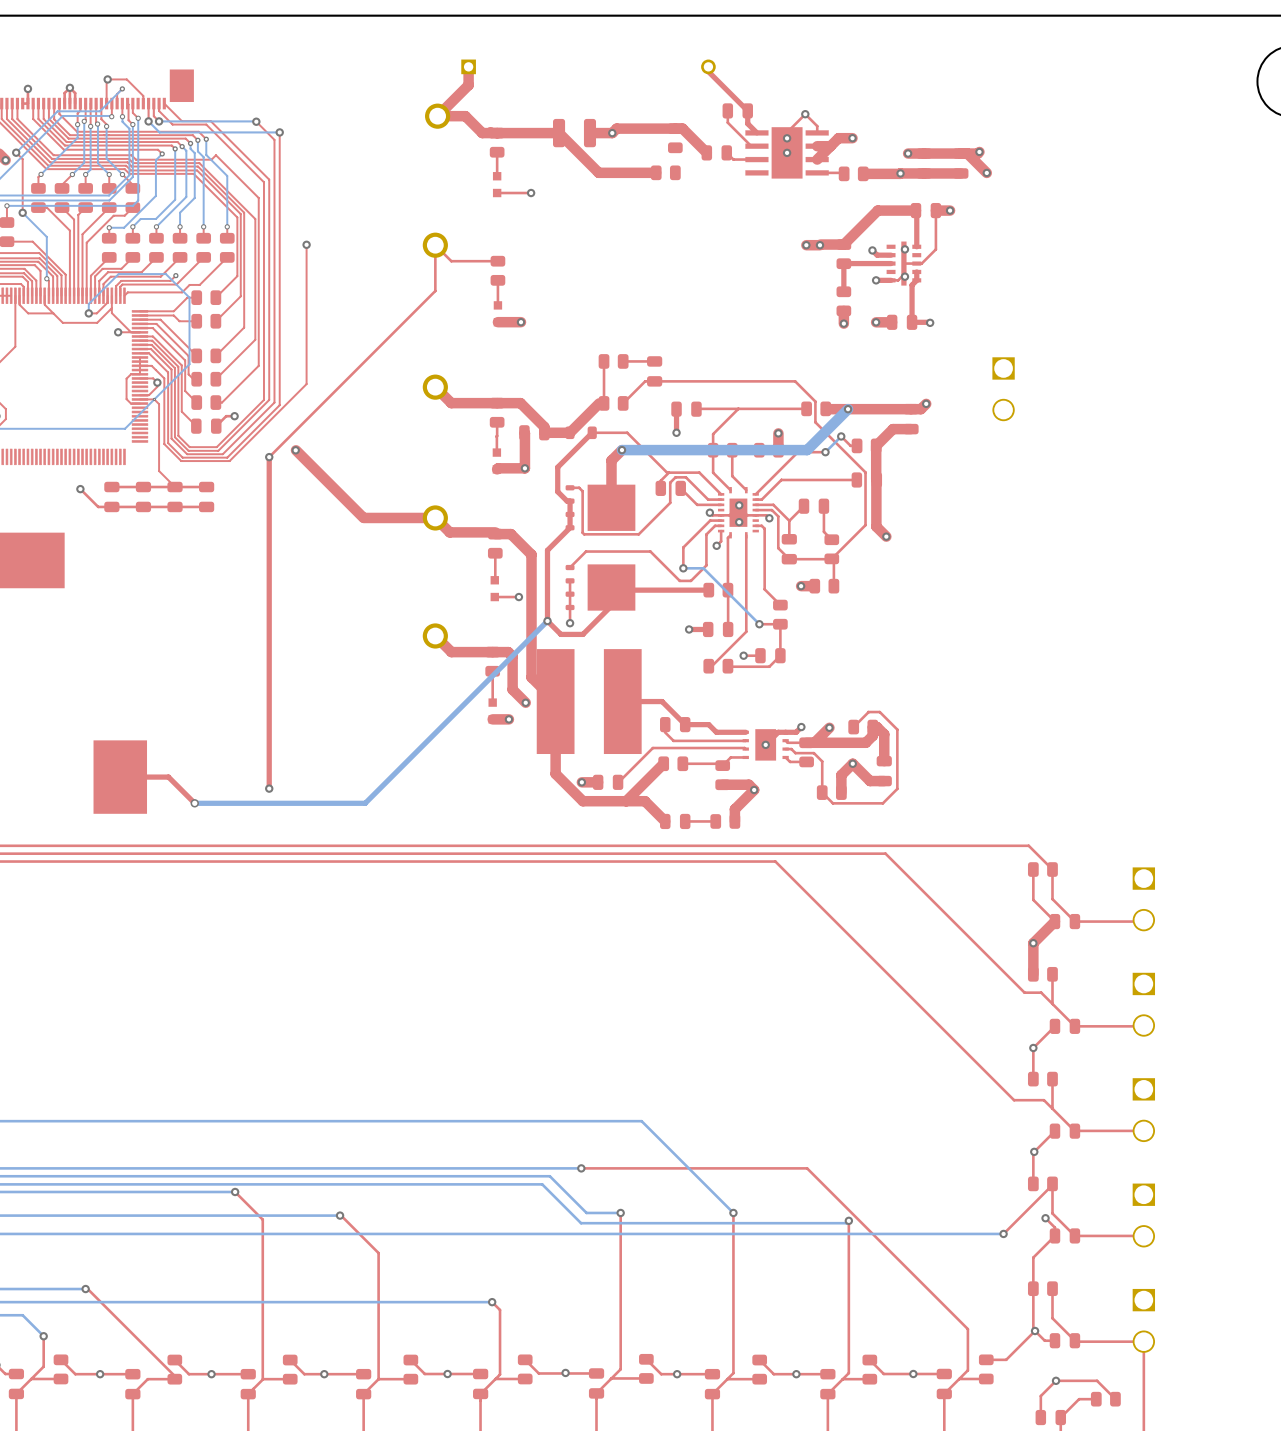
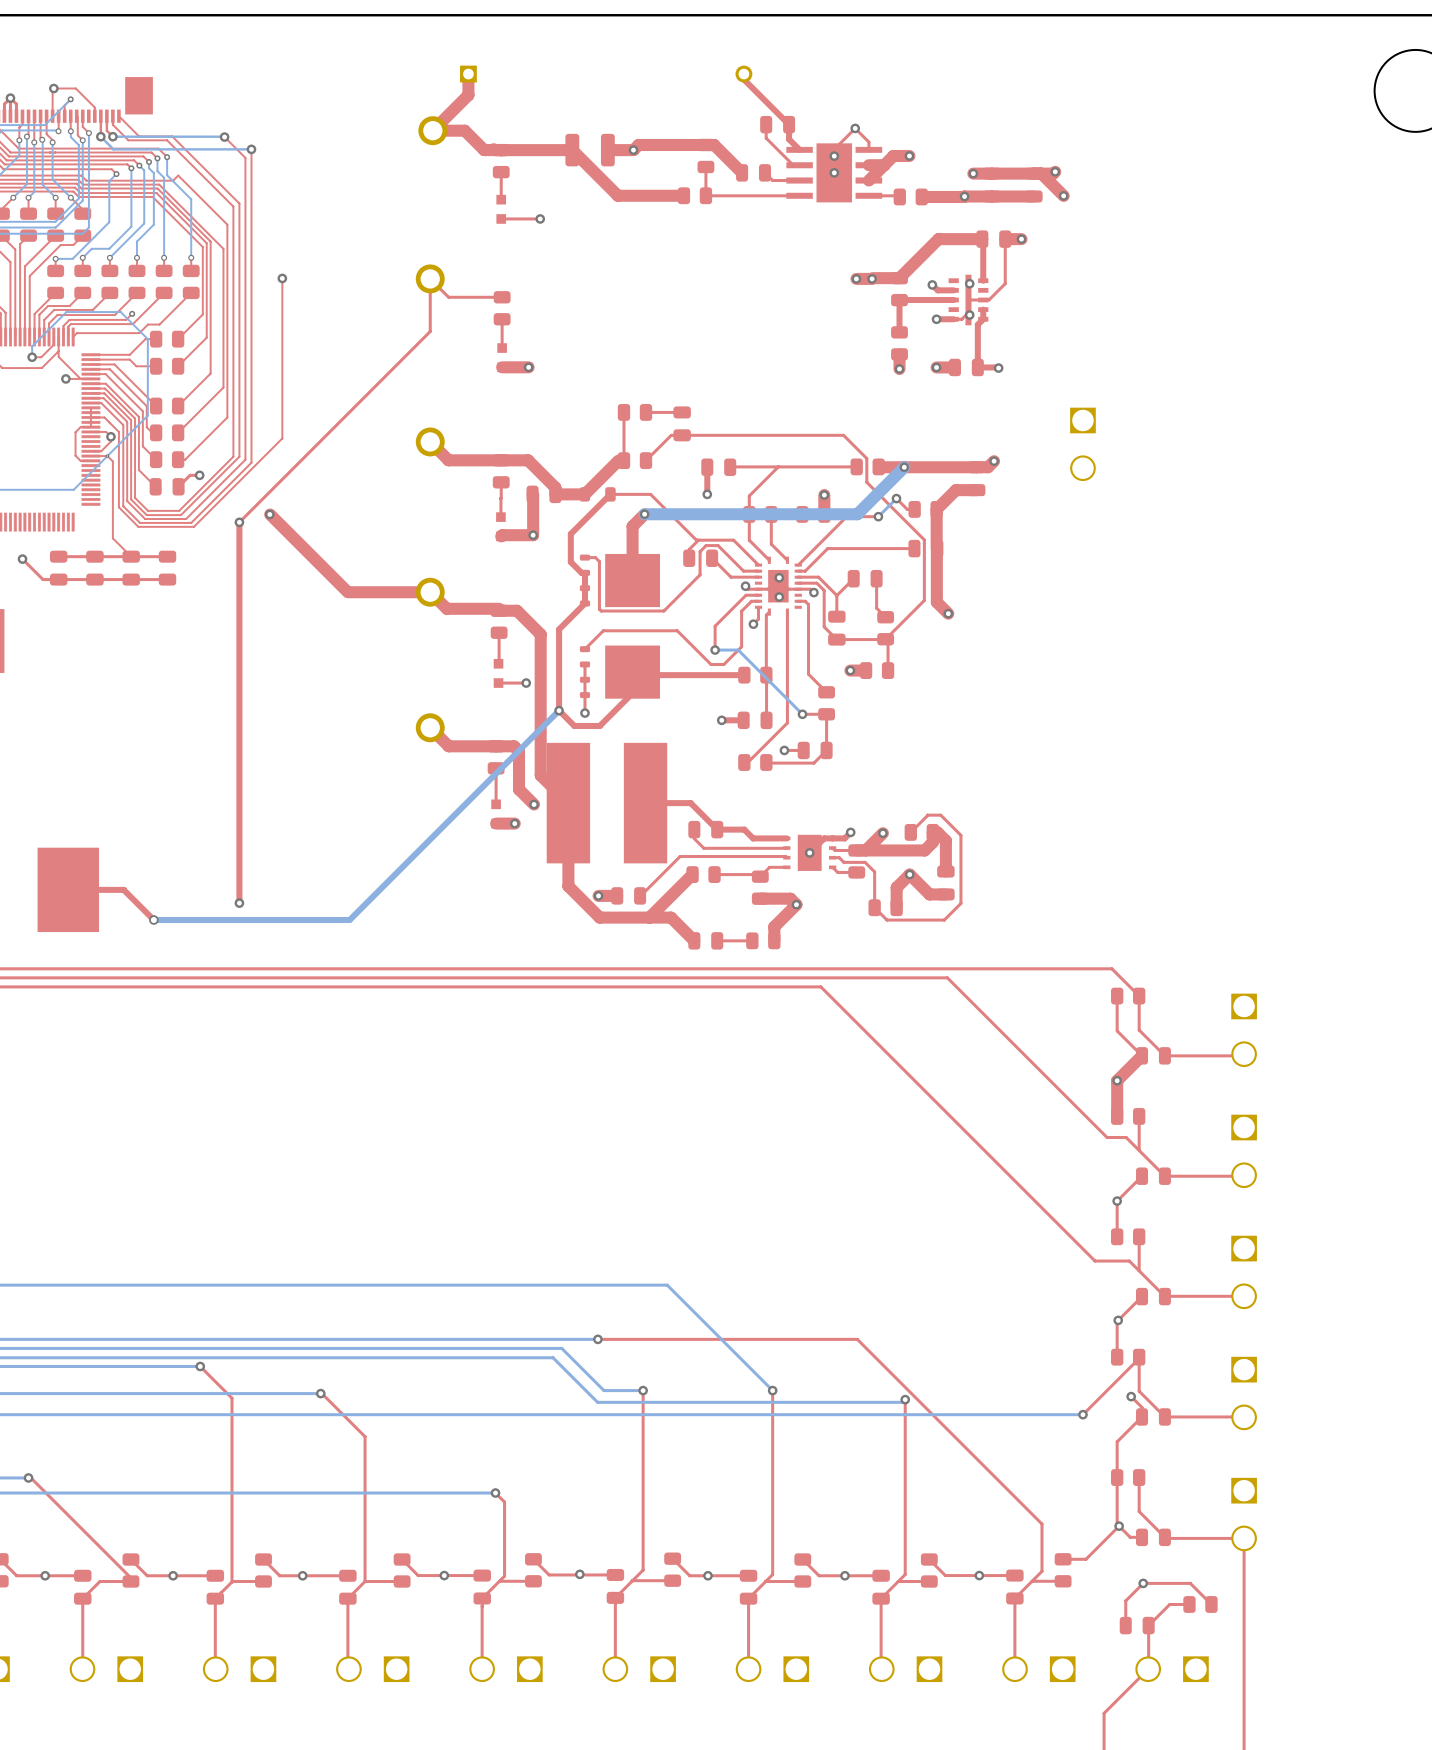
top track: none -> (705, 166) (705, 195) (708, 195)
top track: none -> (799, 195) (708, 195)

